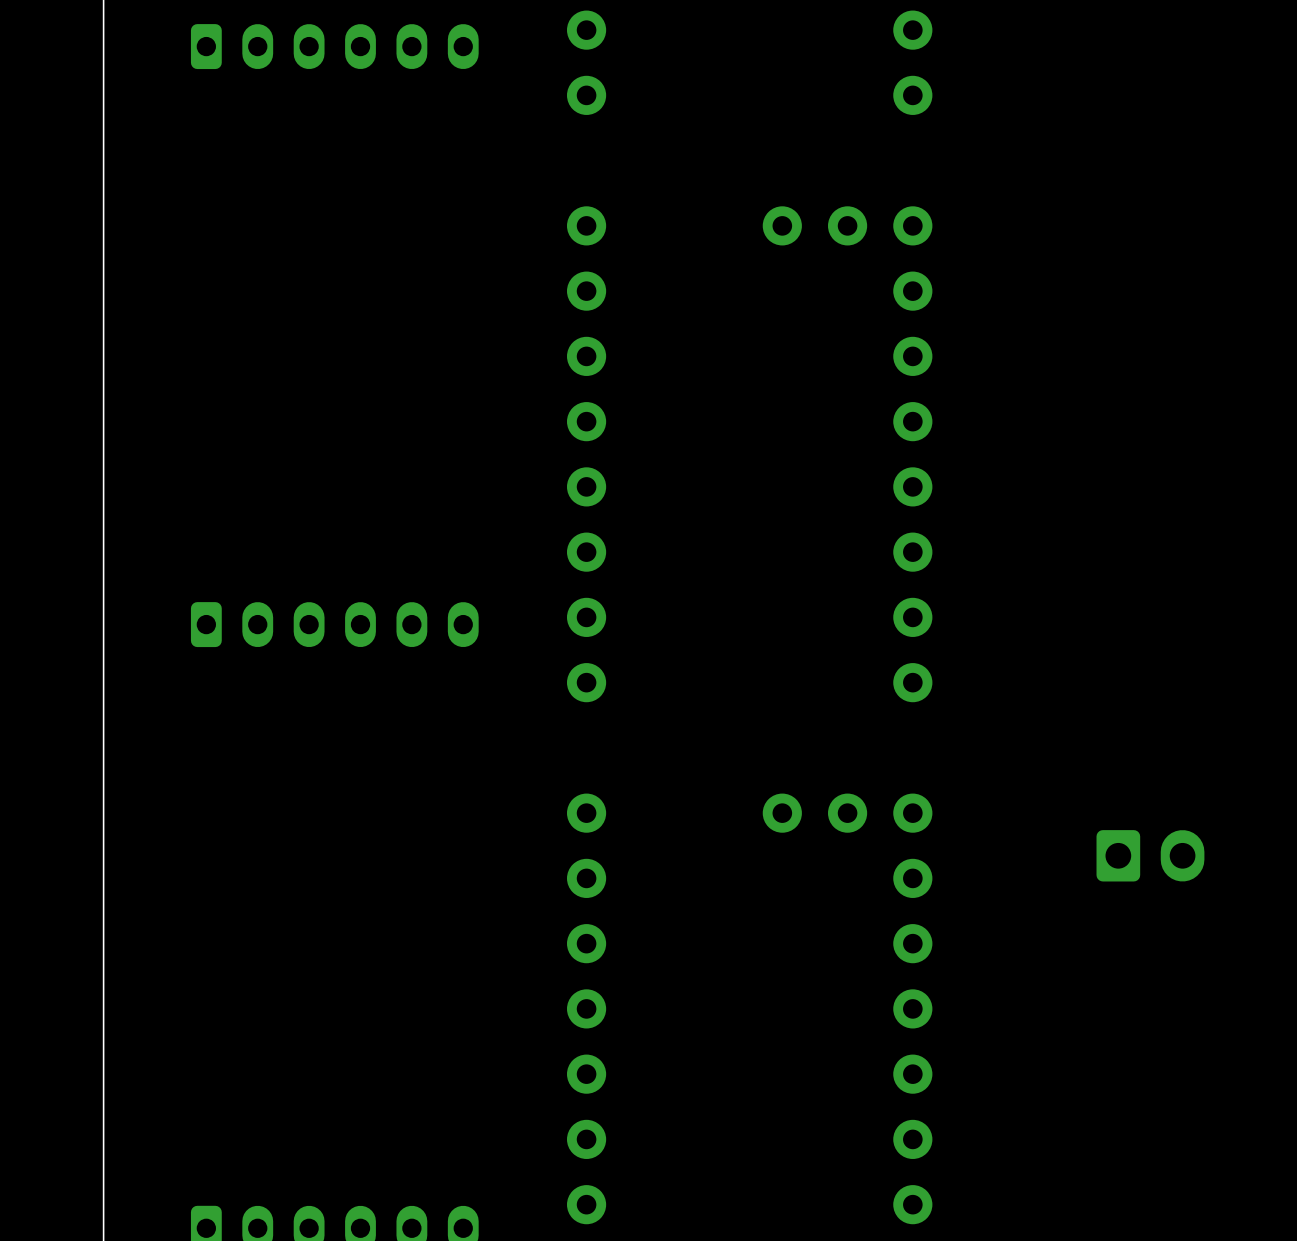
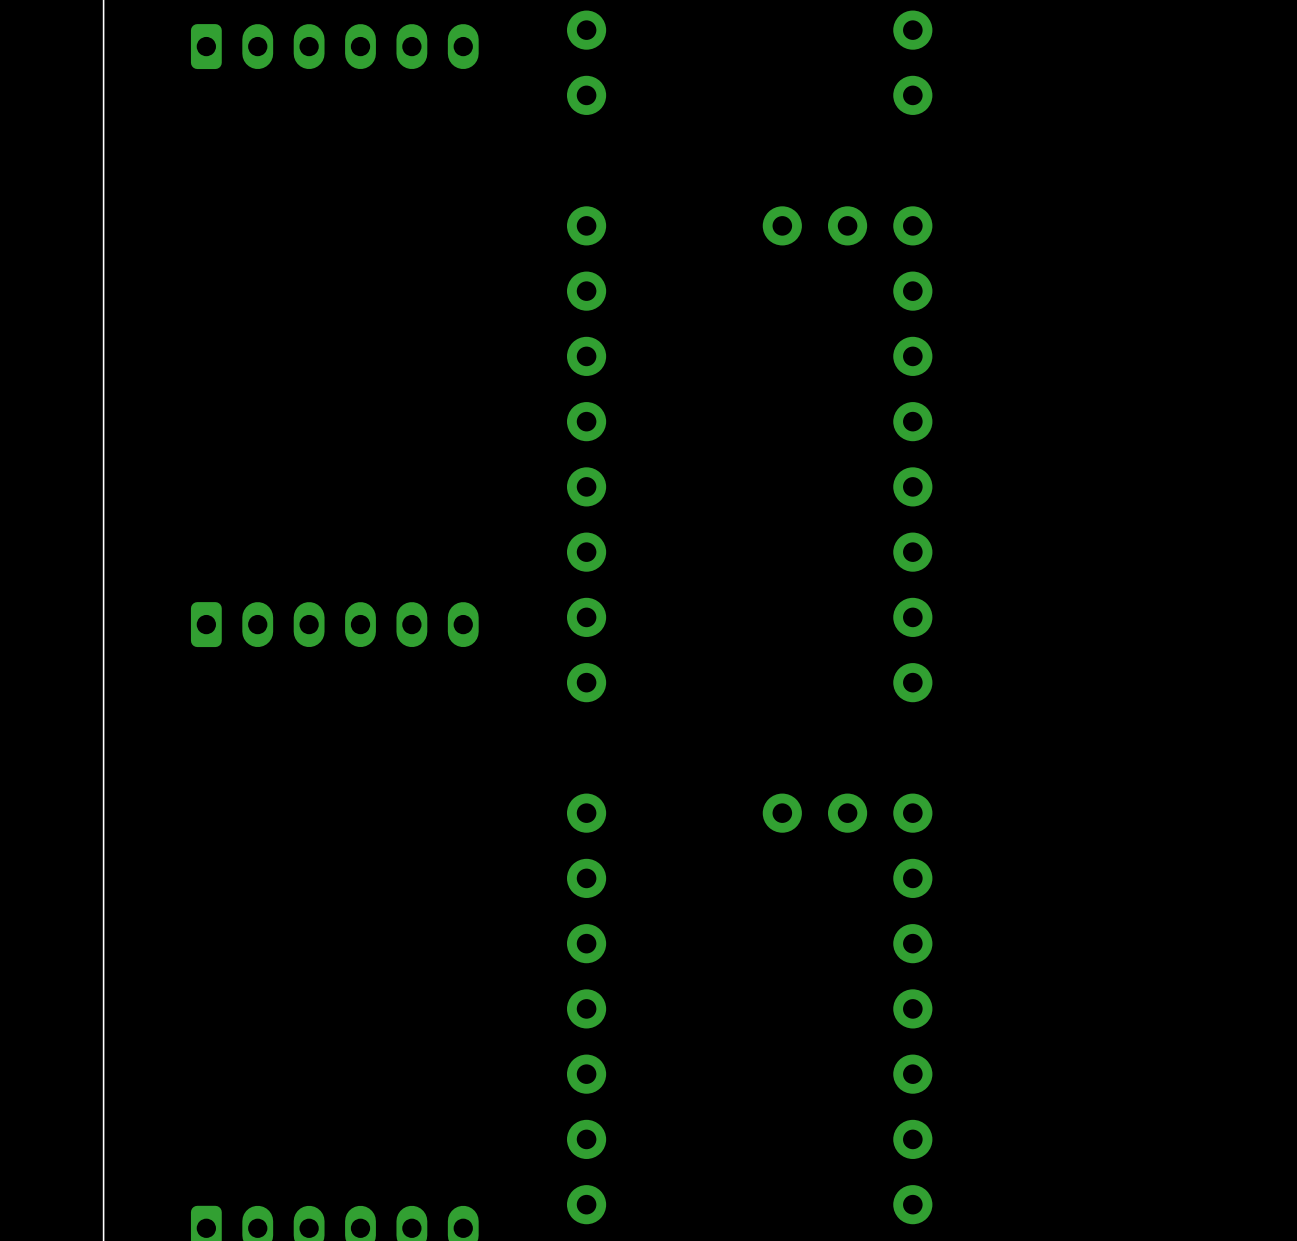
part: (1150, 855) -> none

